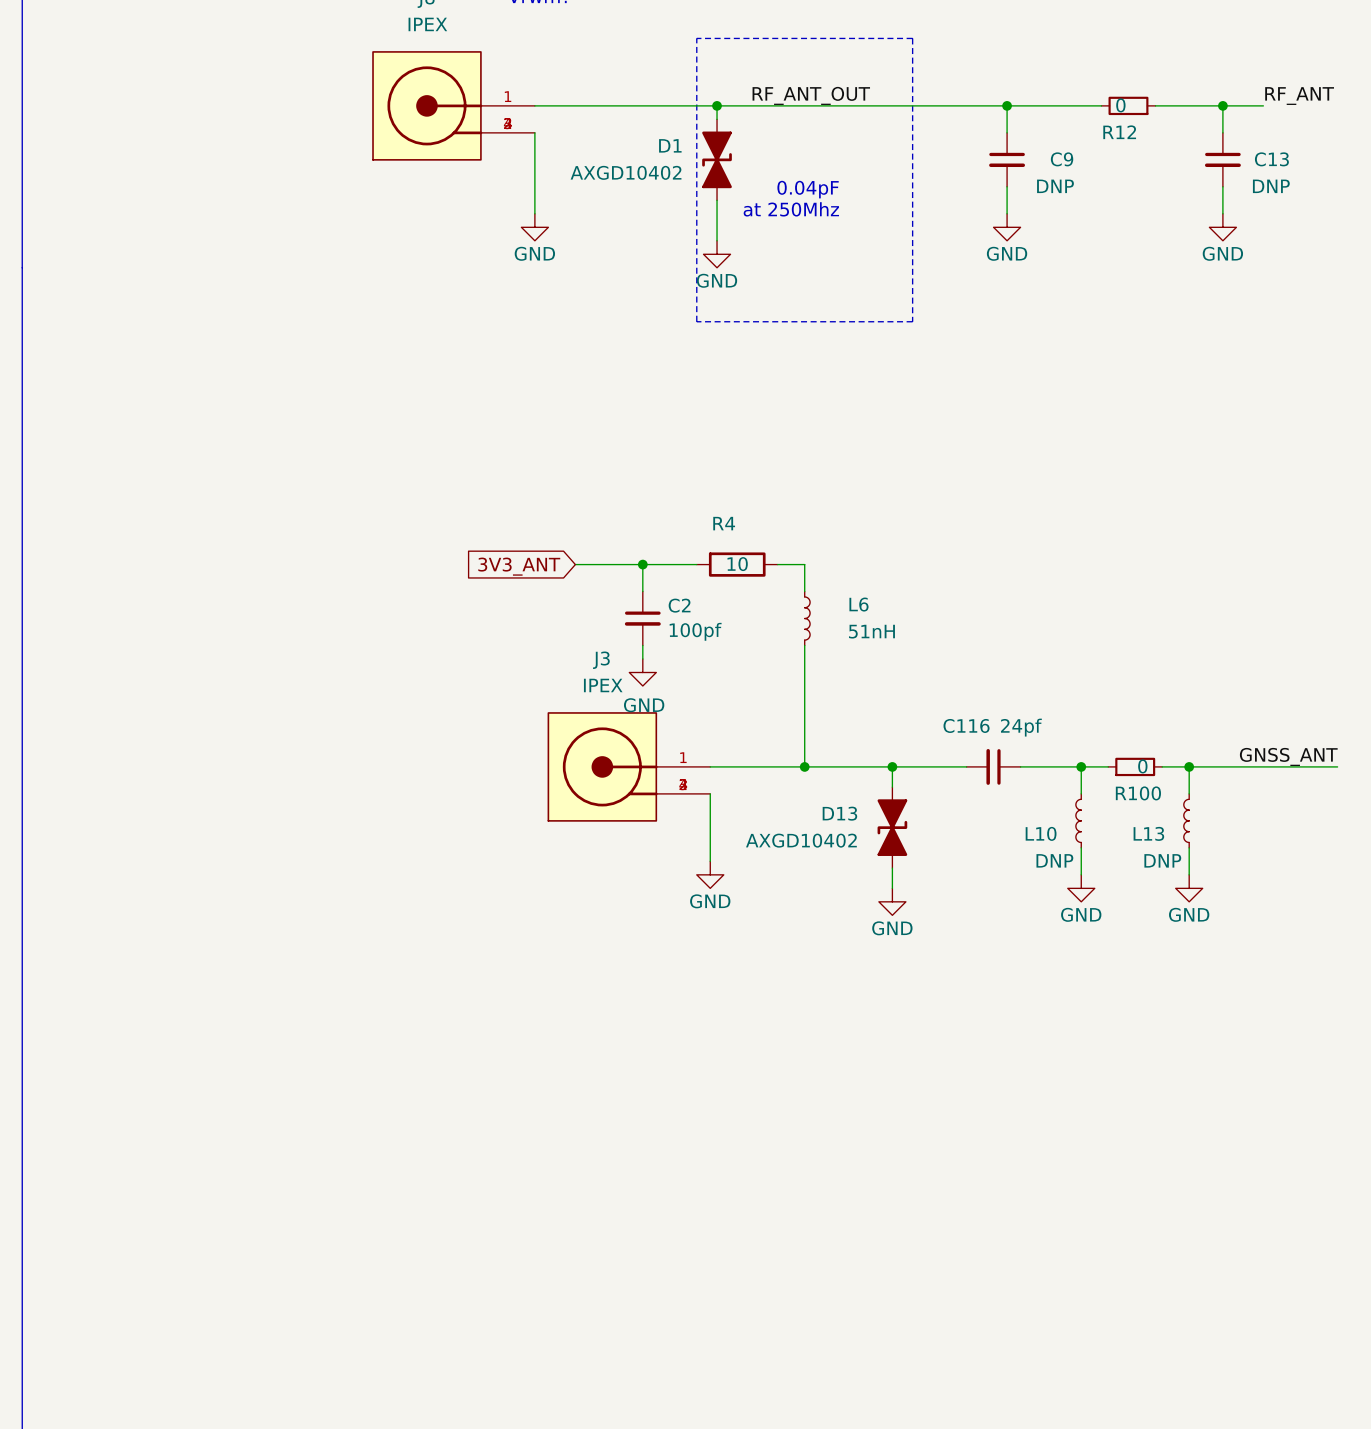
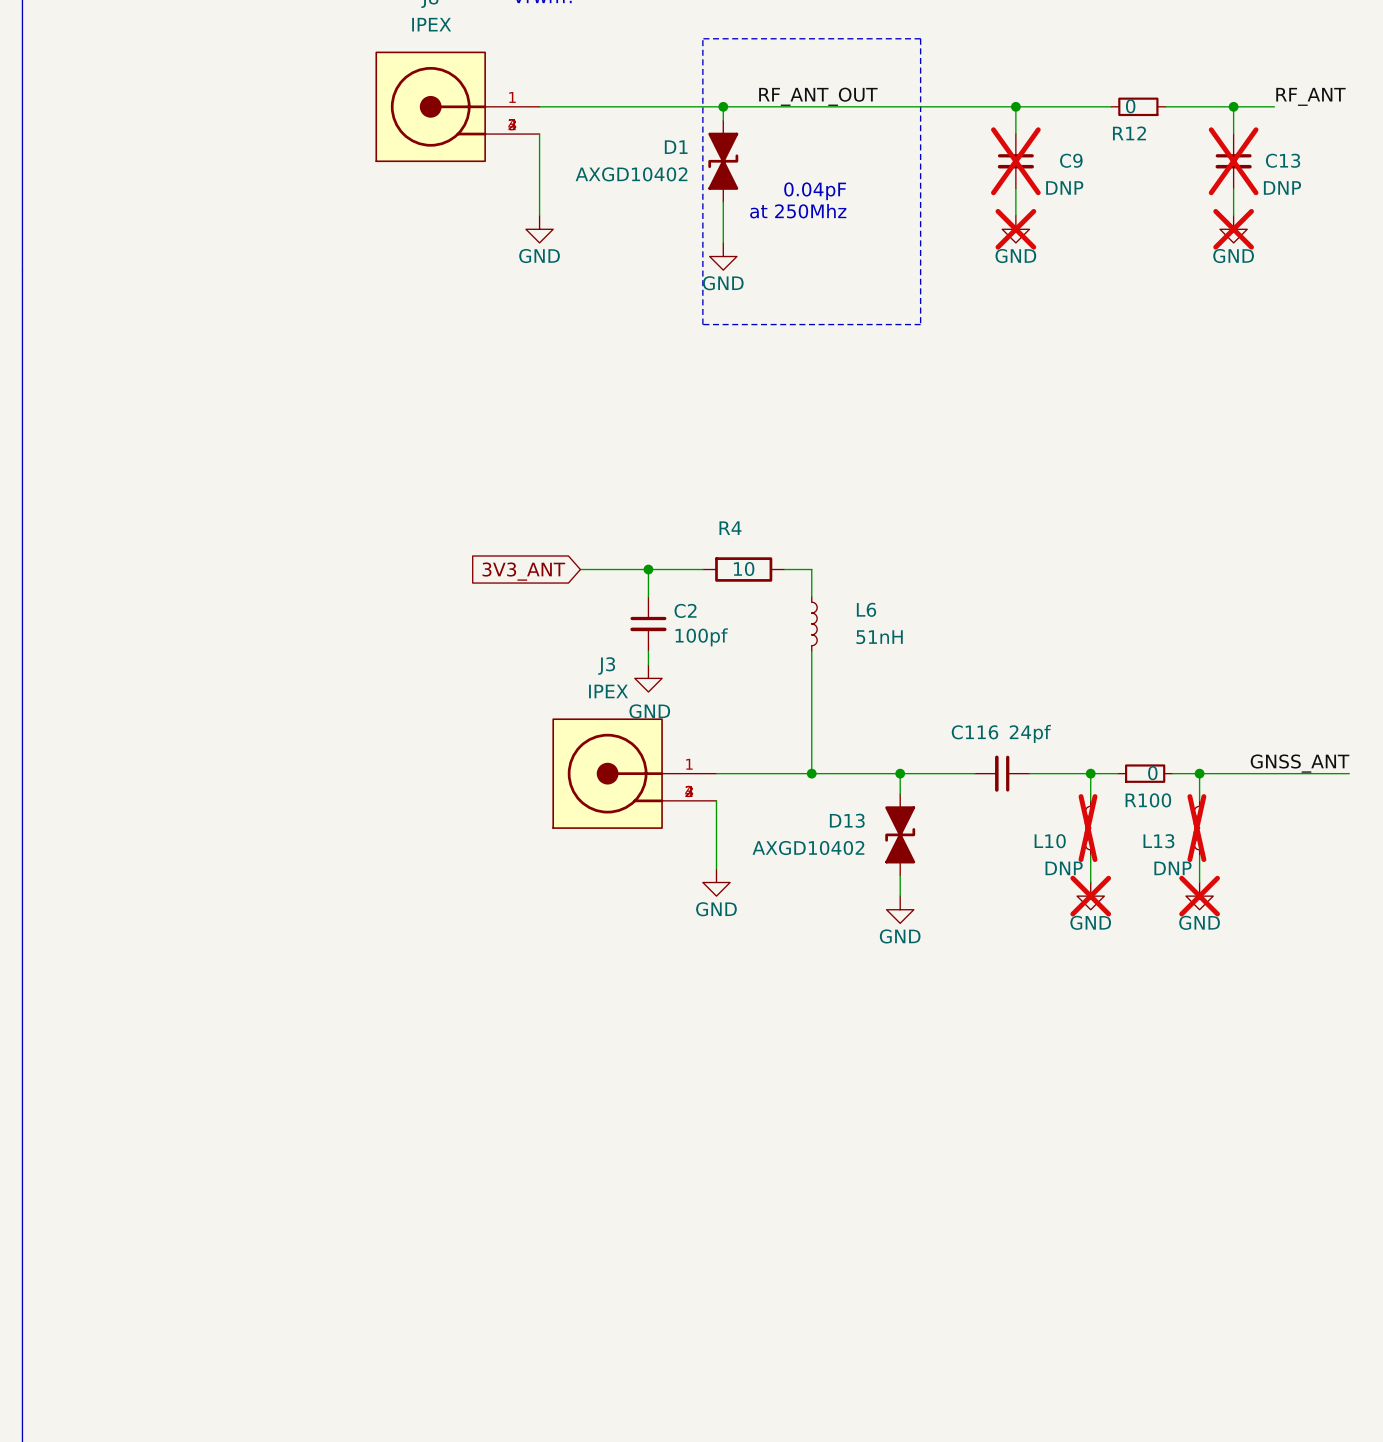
C9 do-not-place cross: none -> (1015, 161)
C13 do-not-place cross: none -> (1233, 161)
power symbol do-not-place cross: none -> (1015, 229)
power symbol do-not-place cross: none -> (1233, 229)
L10 do-not-place cross: none -> (1088, 828)
L13 do-not-place cross: none -> (1196, 828)
power symbol do-not-place cross: none -> (1090, 896)
power symbol do-not-place cross: none -> (1199, 896)

